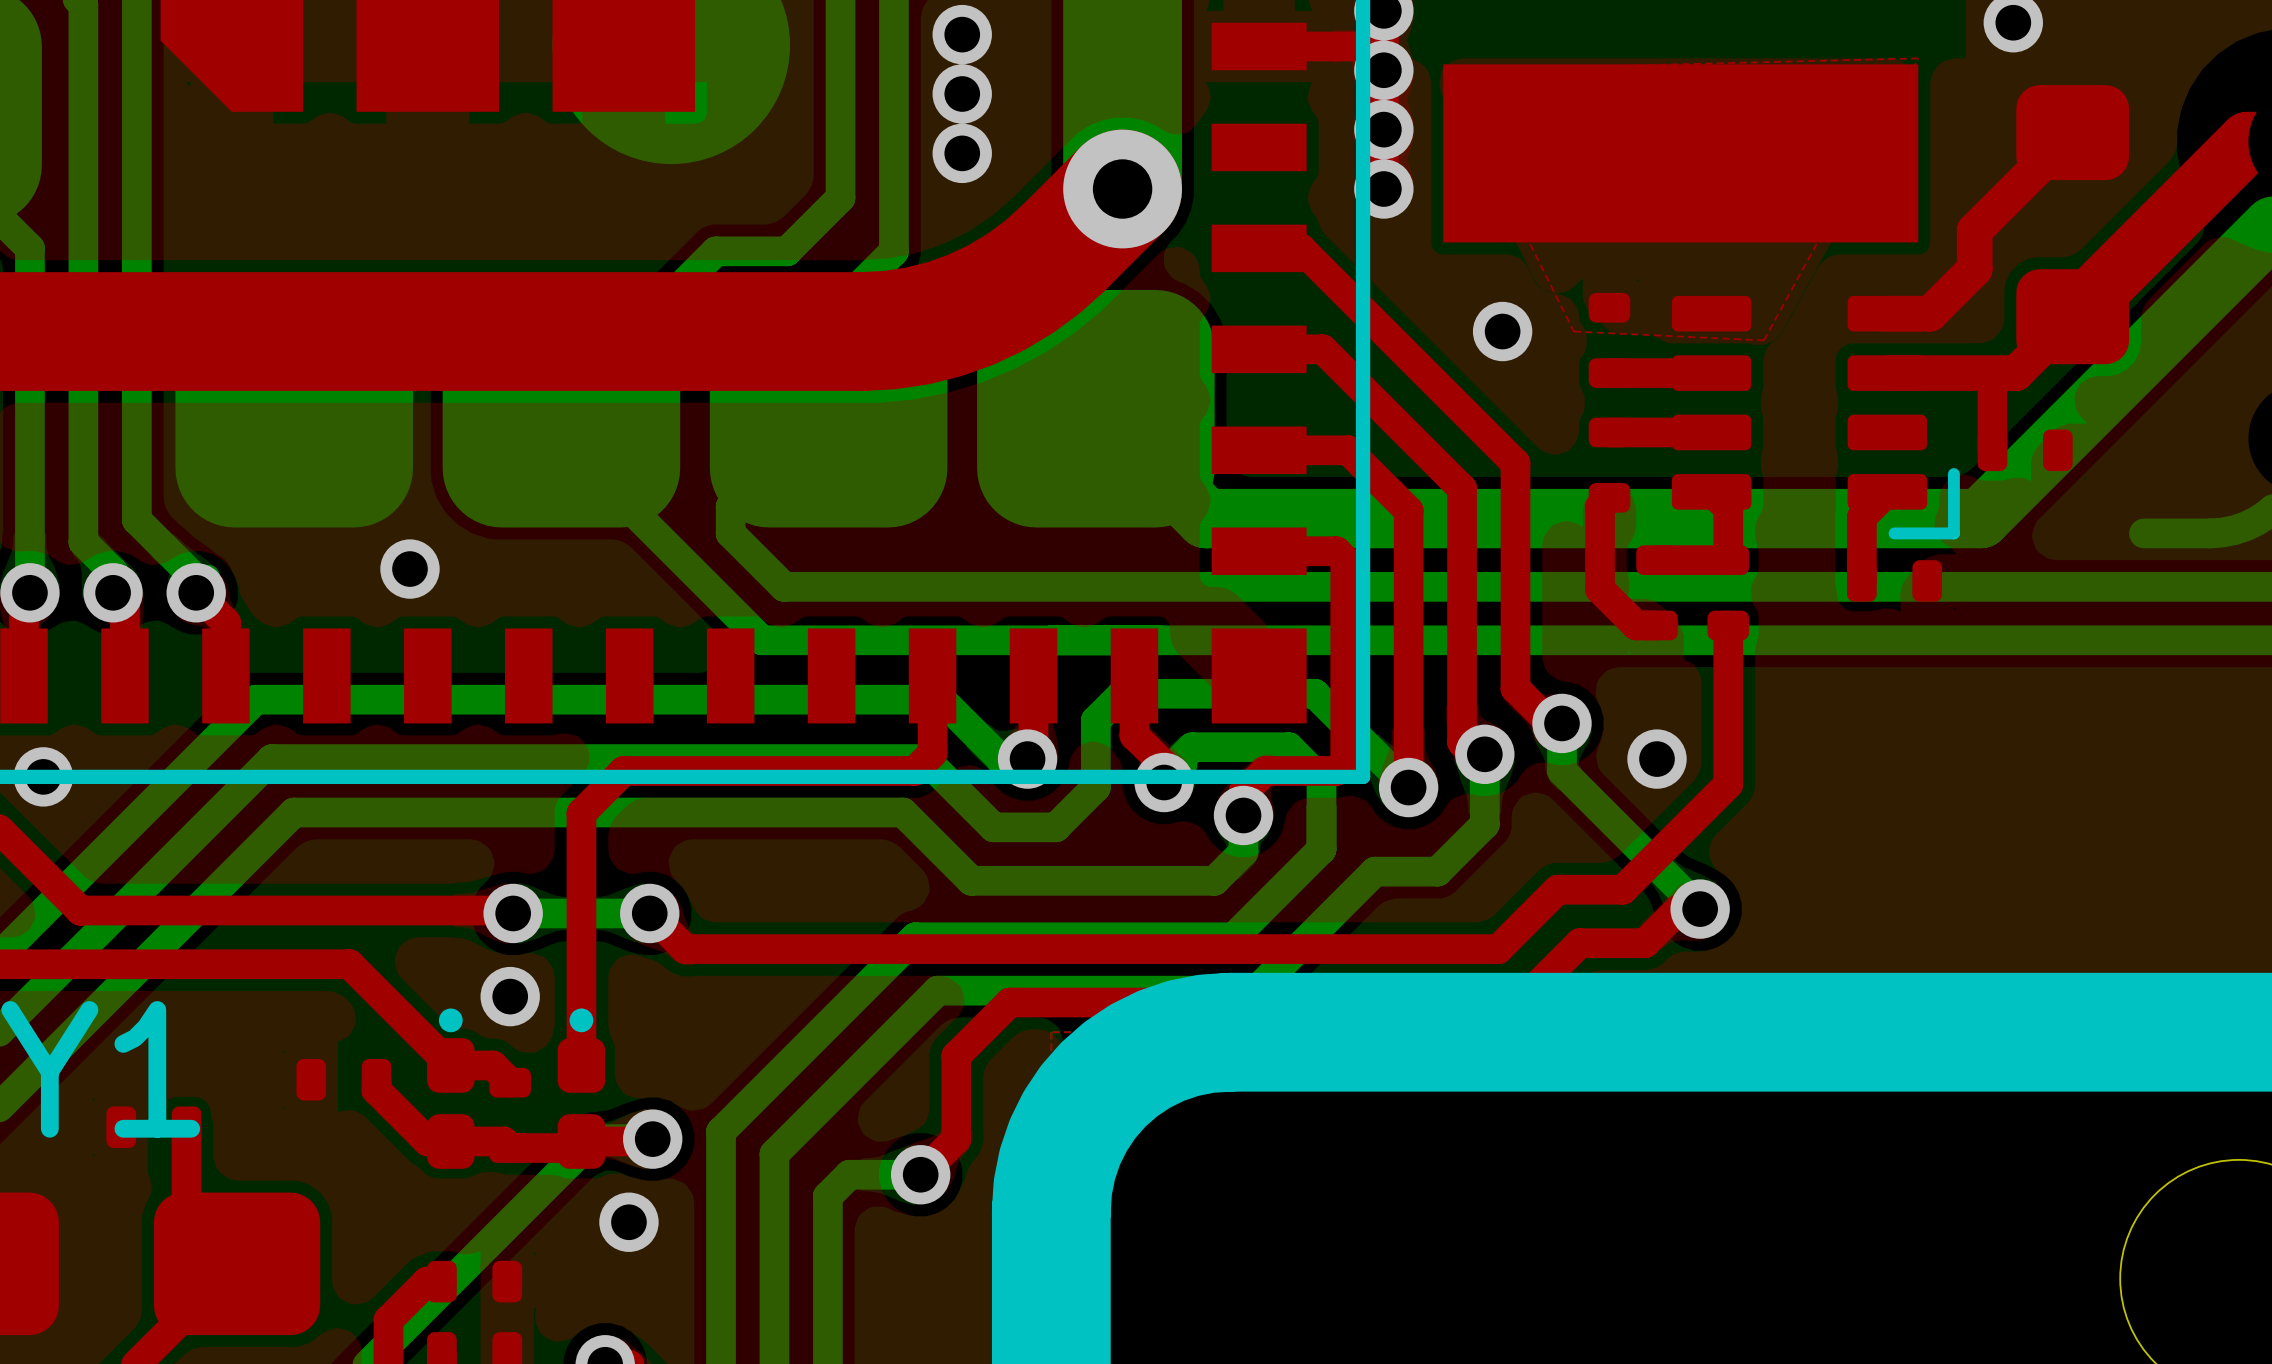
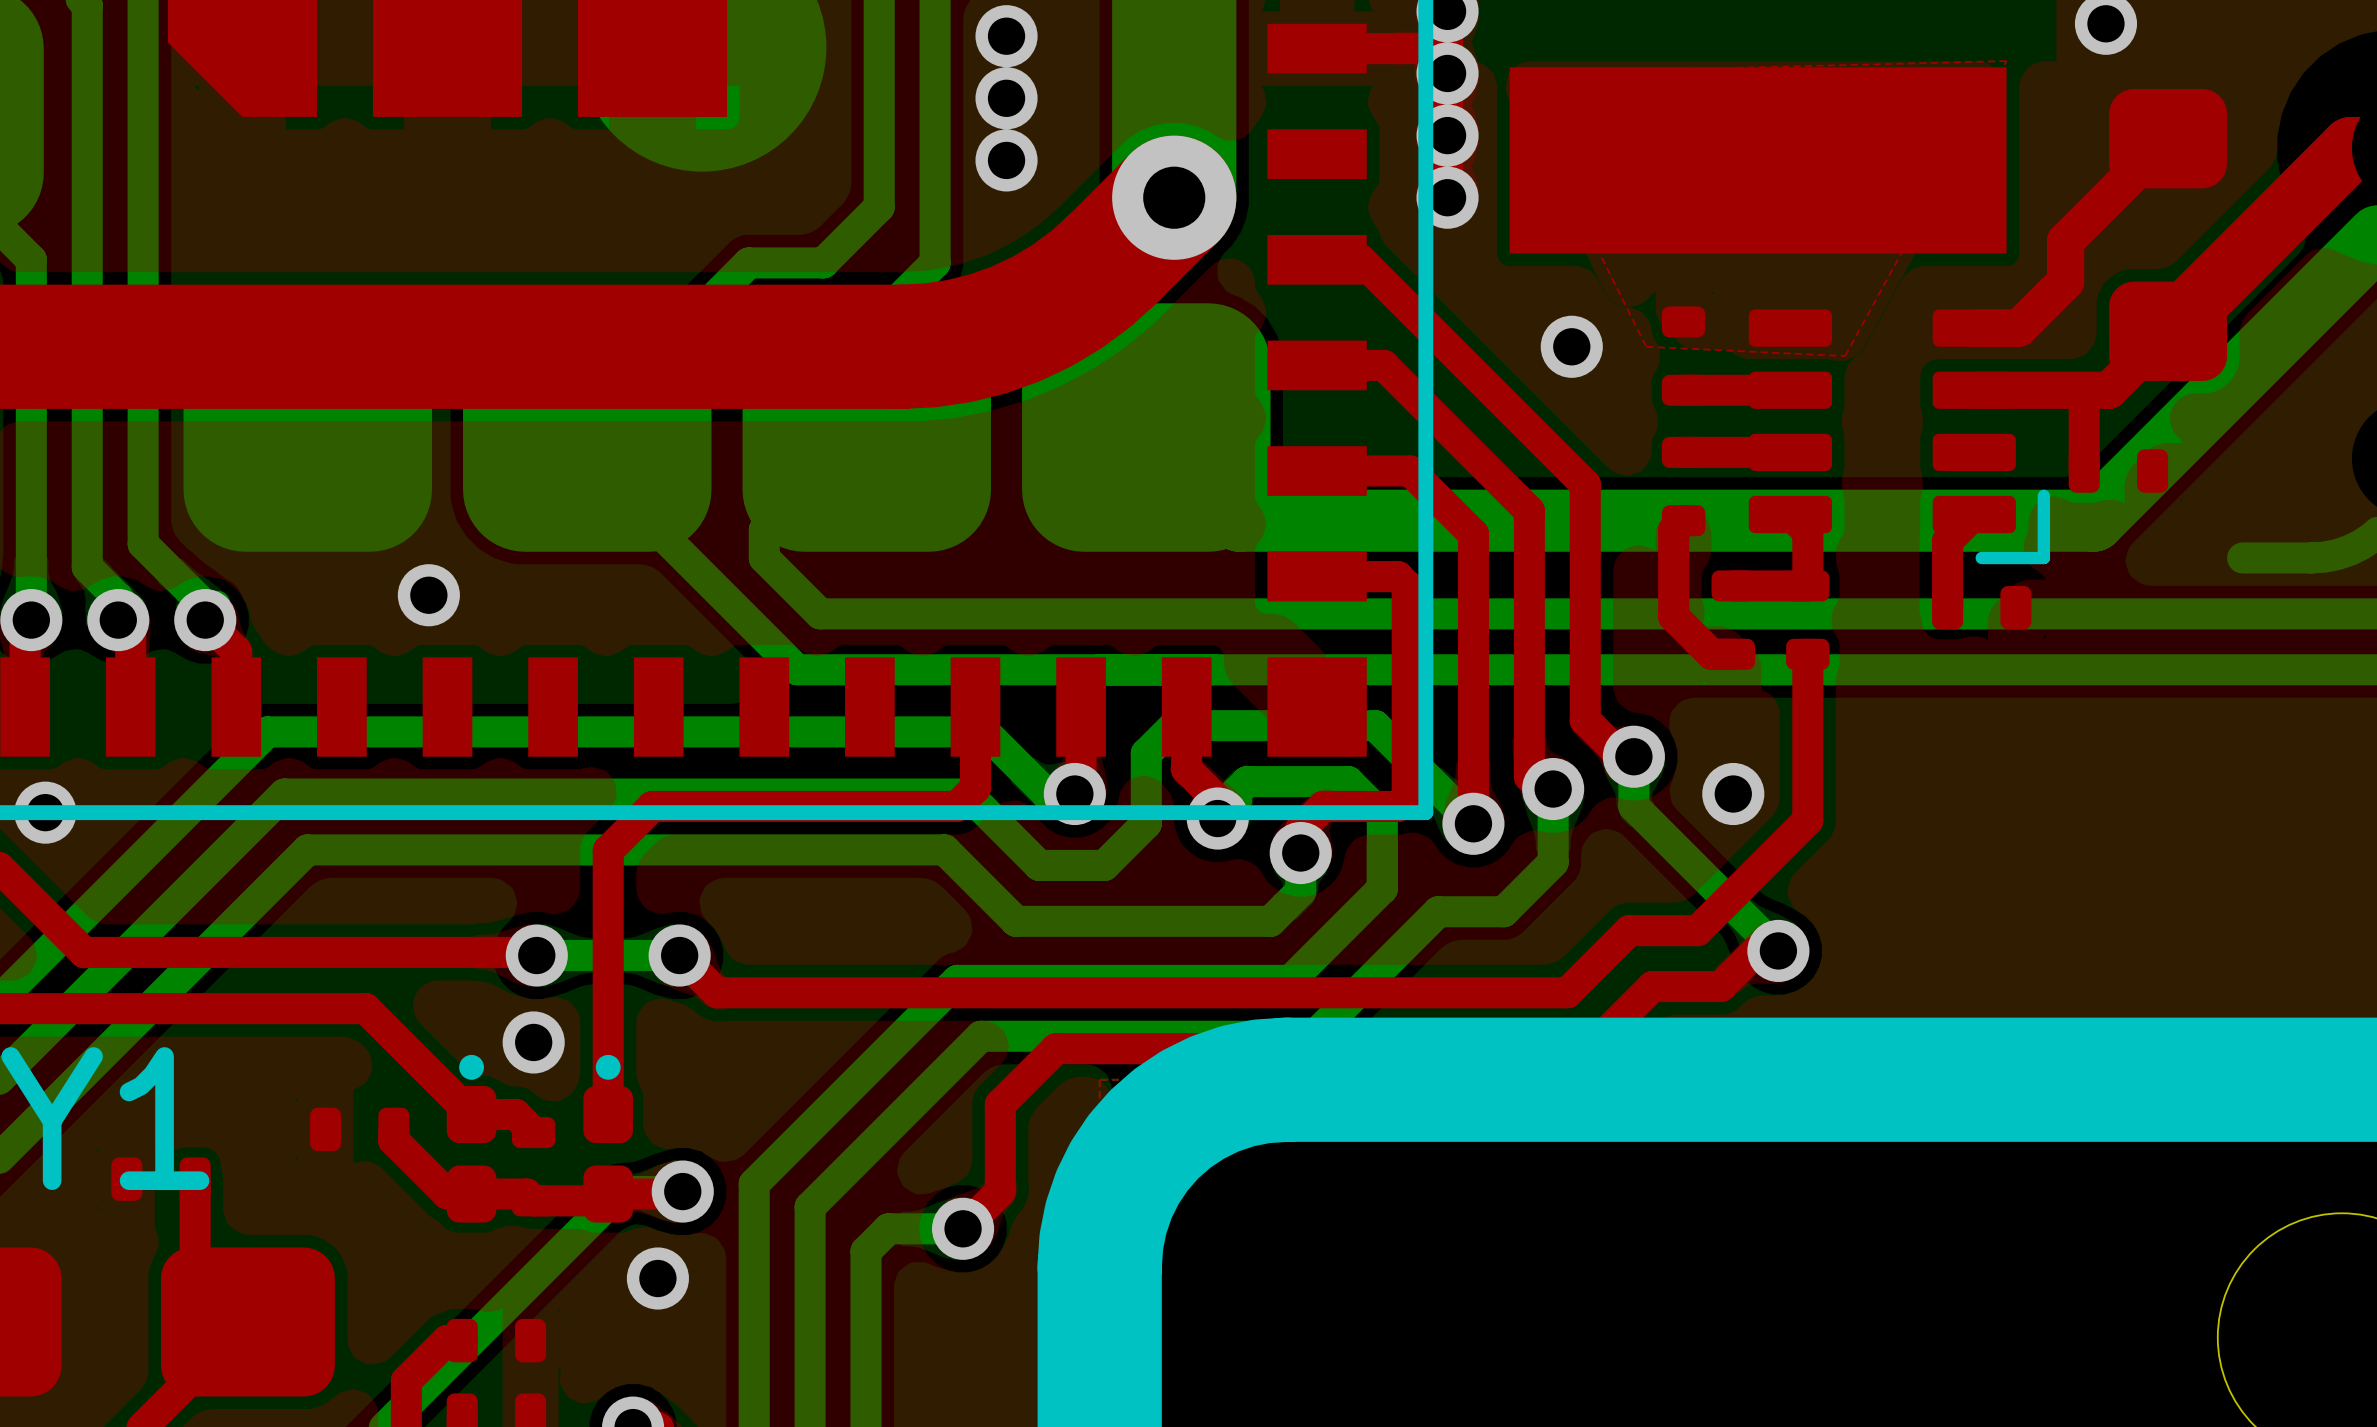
bottom track: (1184, 497) (1205, 518) (1980, 518) (2001, 497) -> (1239, 520) (2093, 520)

